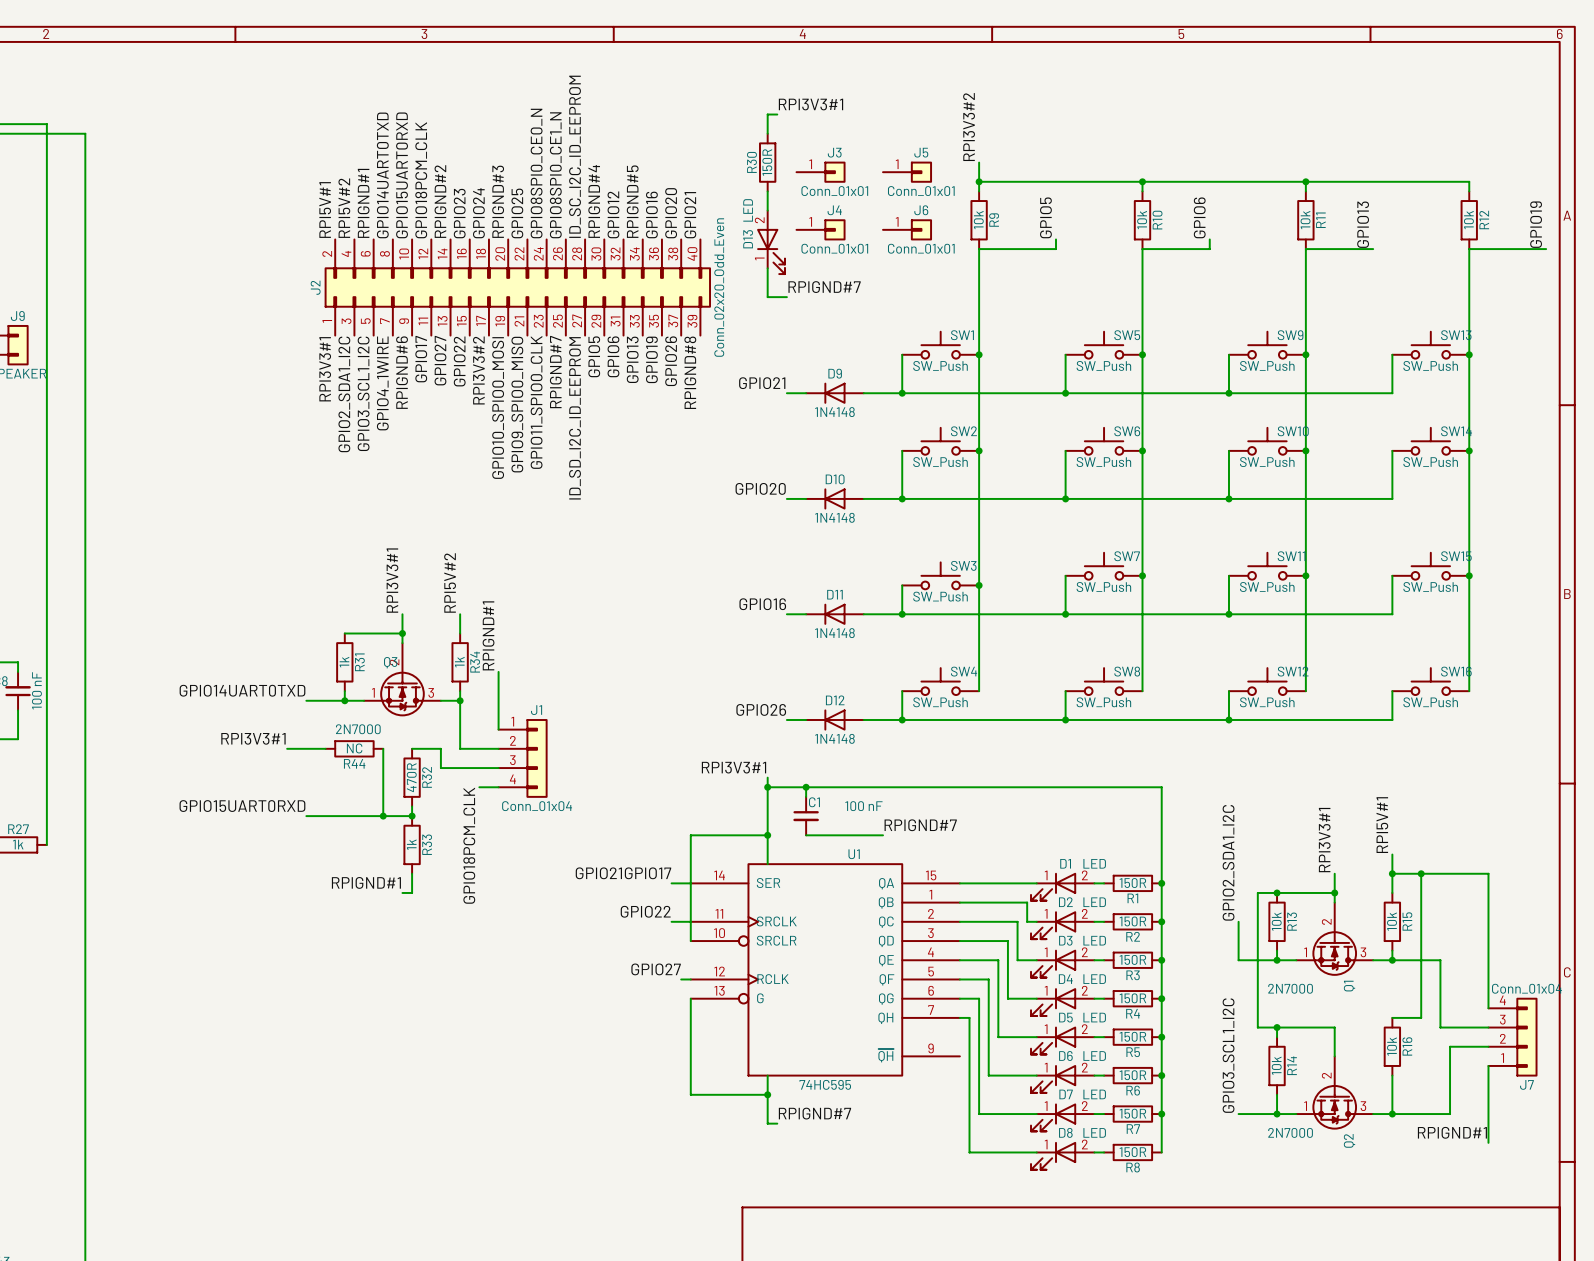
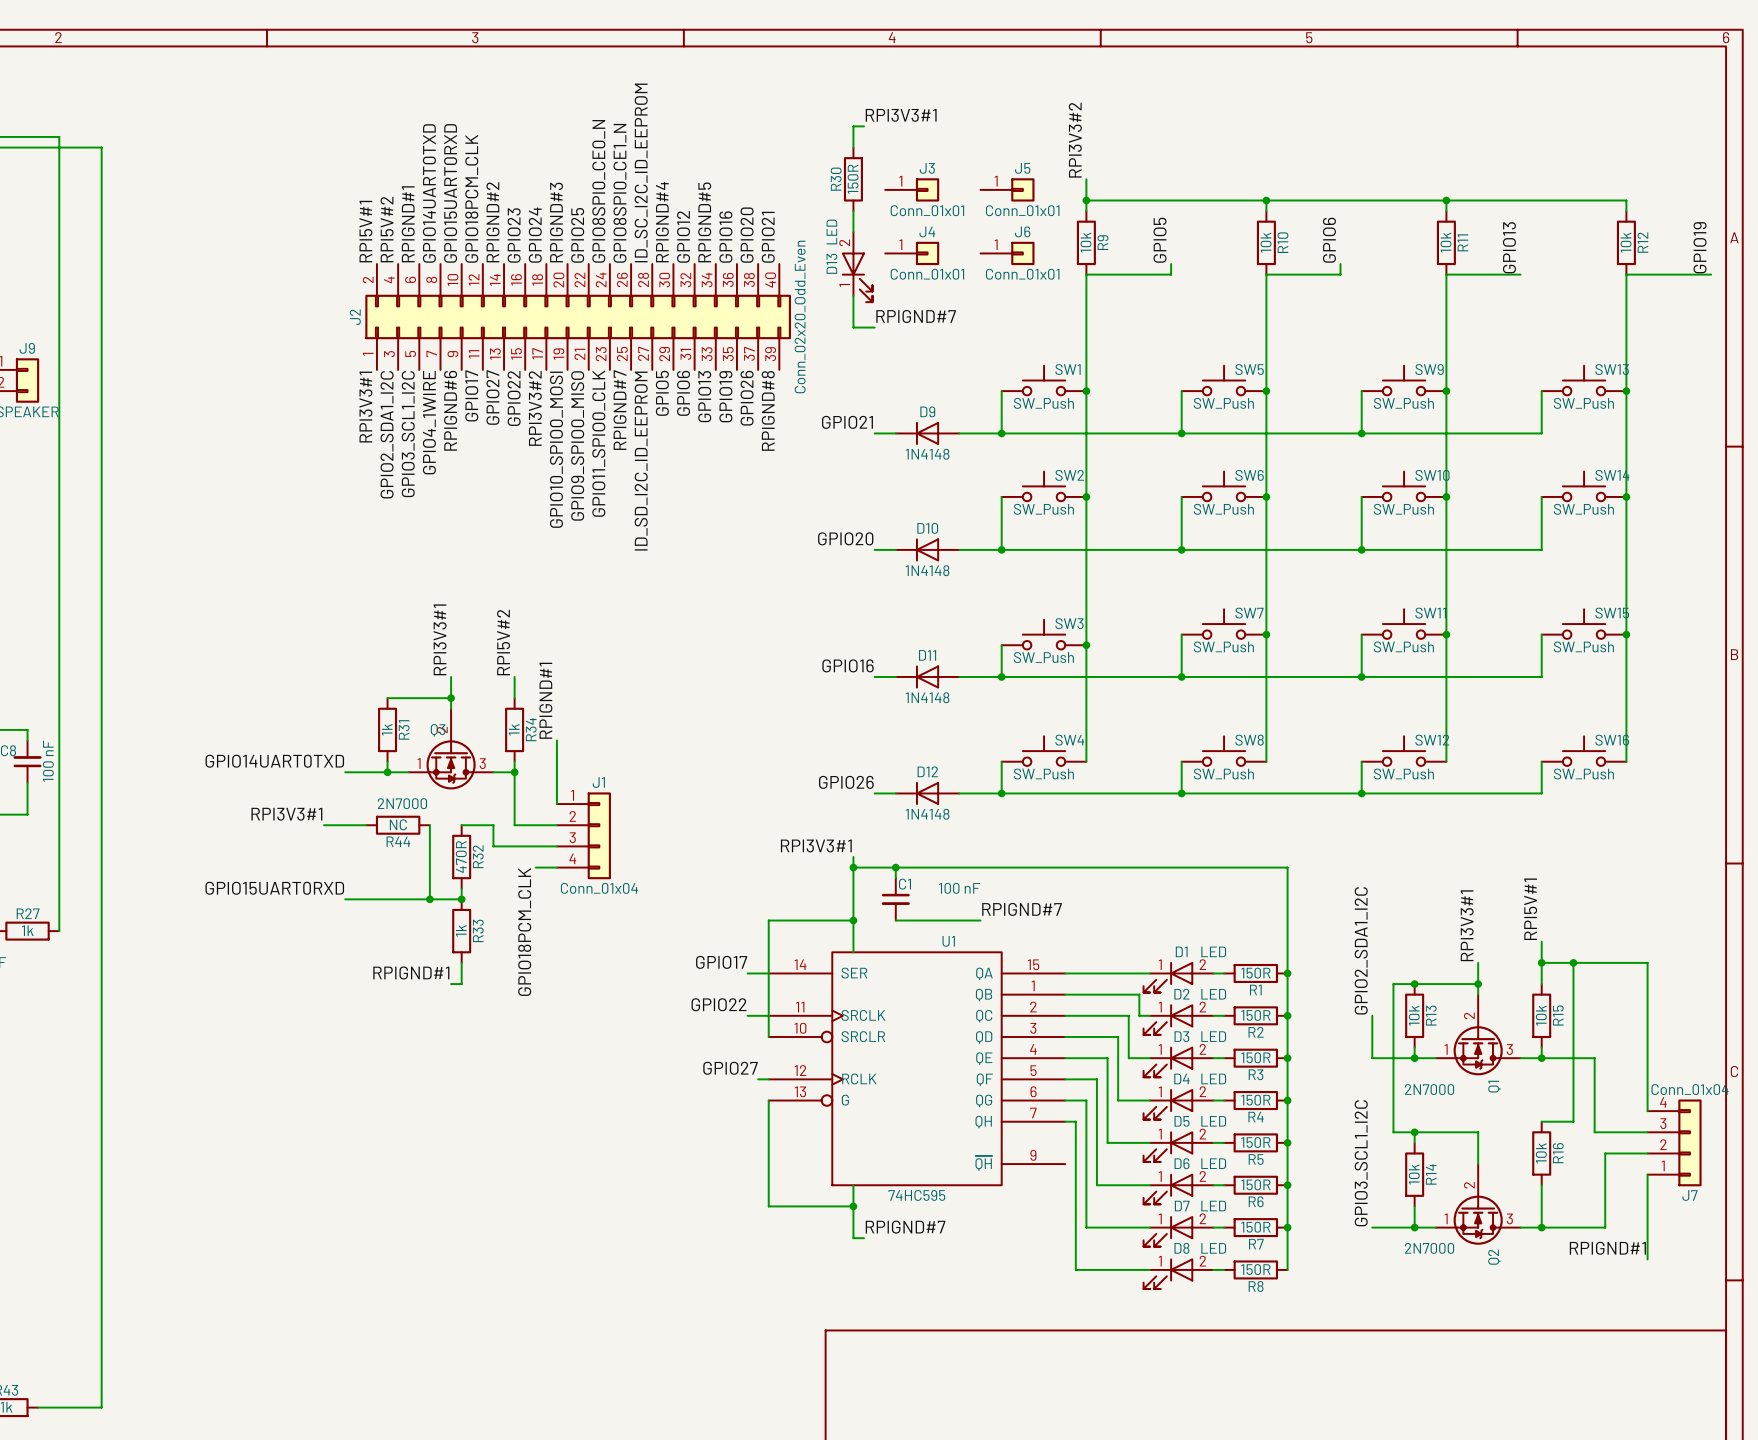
label: GPIO21 (598, 873) -> none

